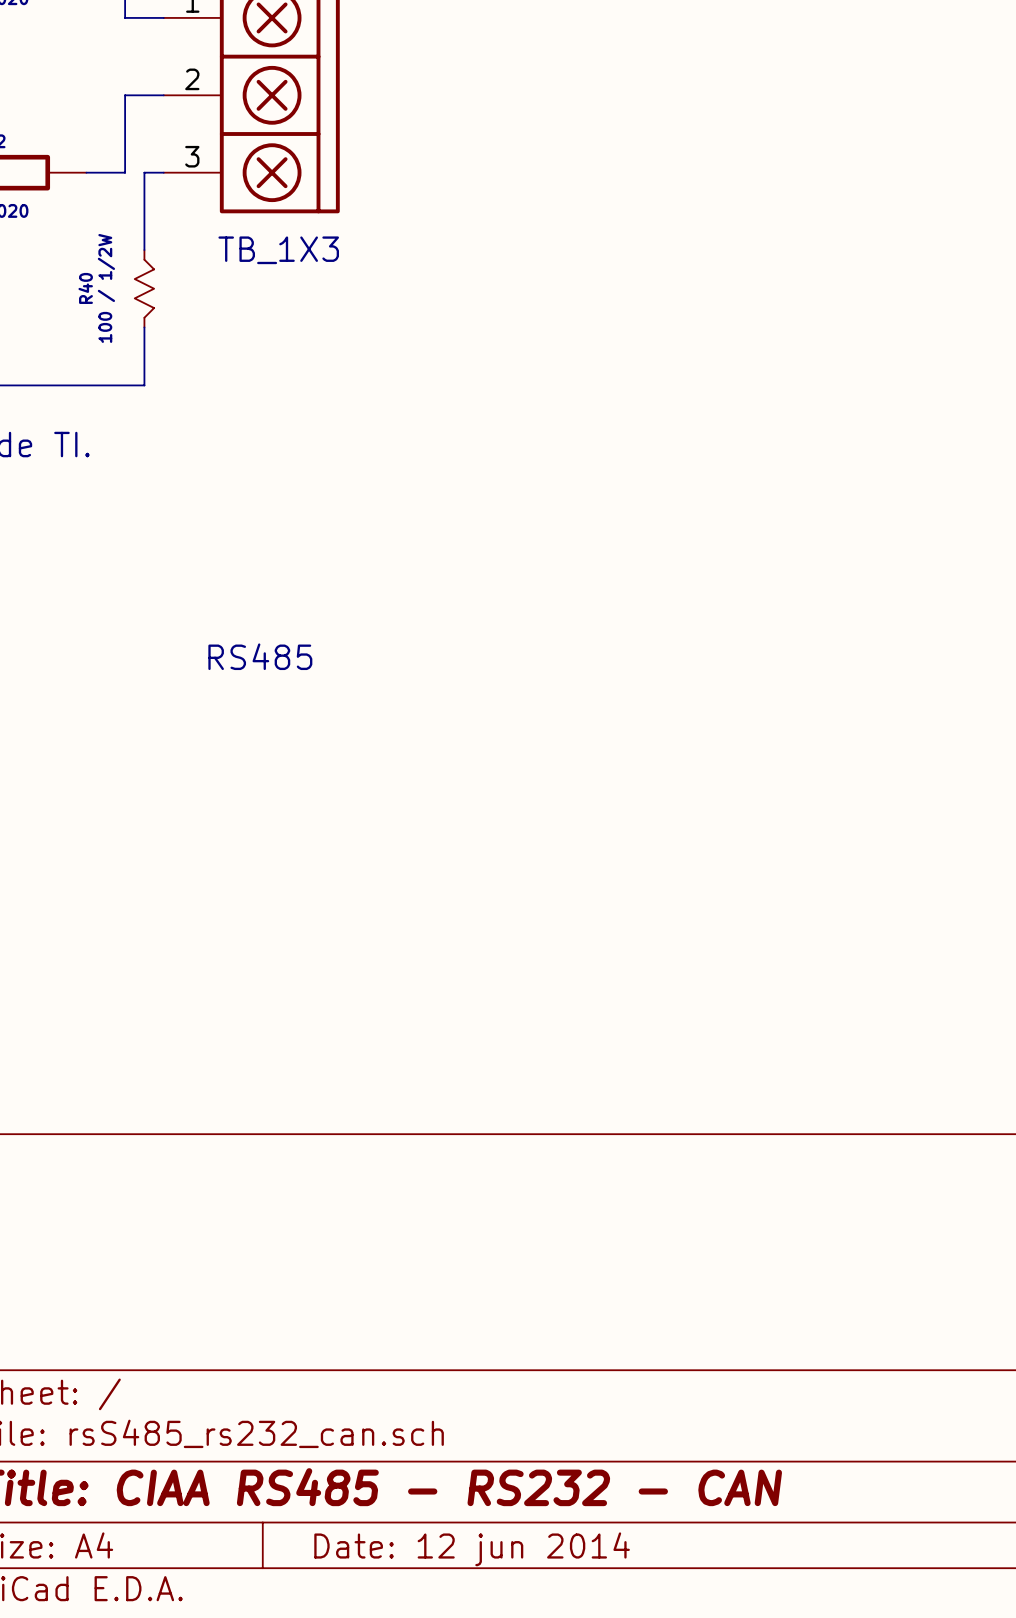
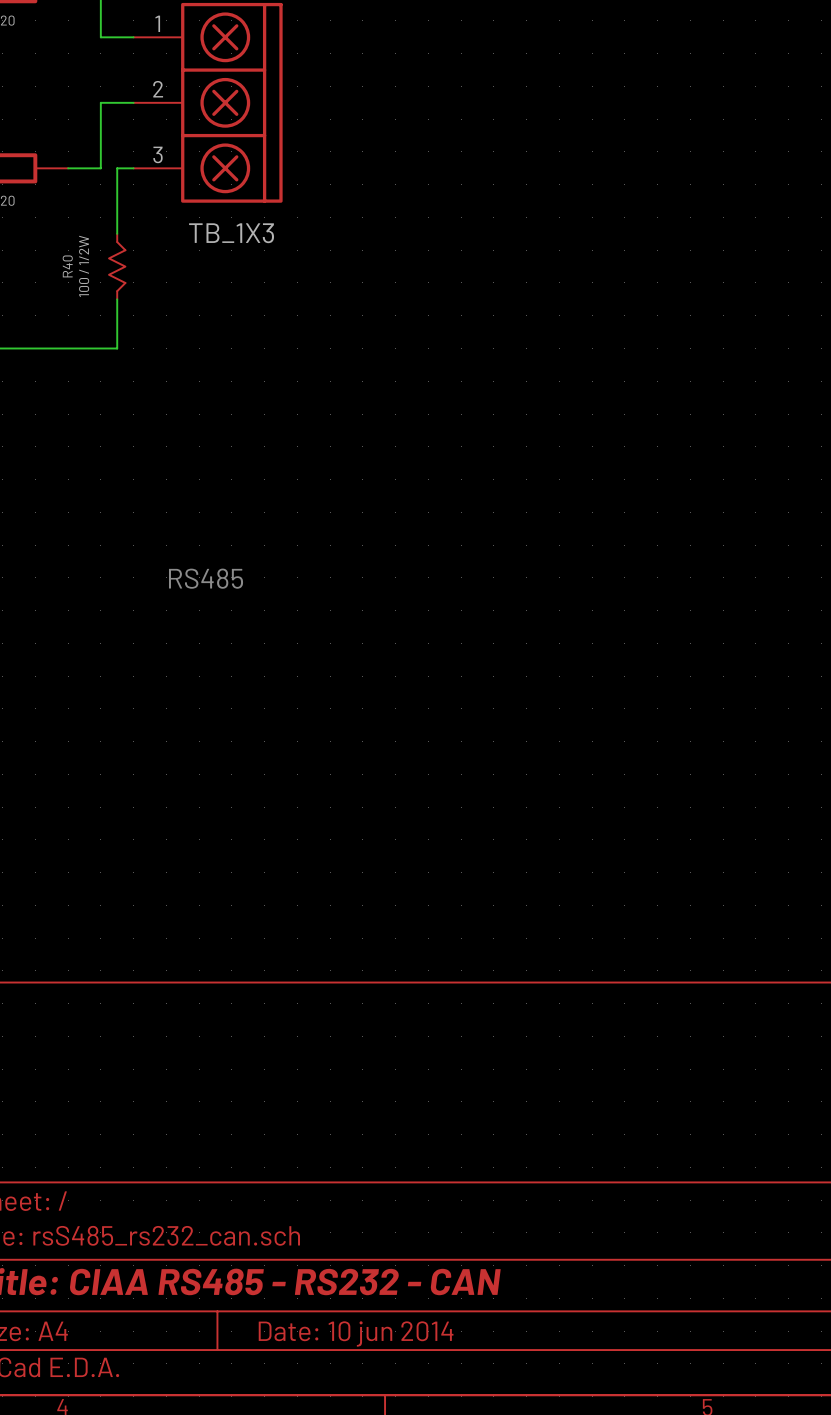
title block: Date: 12 jun 2014 (472, 1549) -> Date: 10 jun 2014 (356, 1334)

